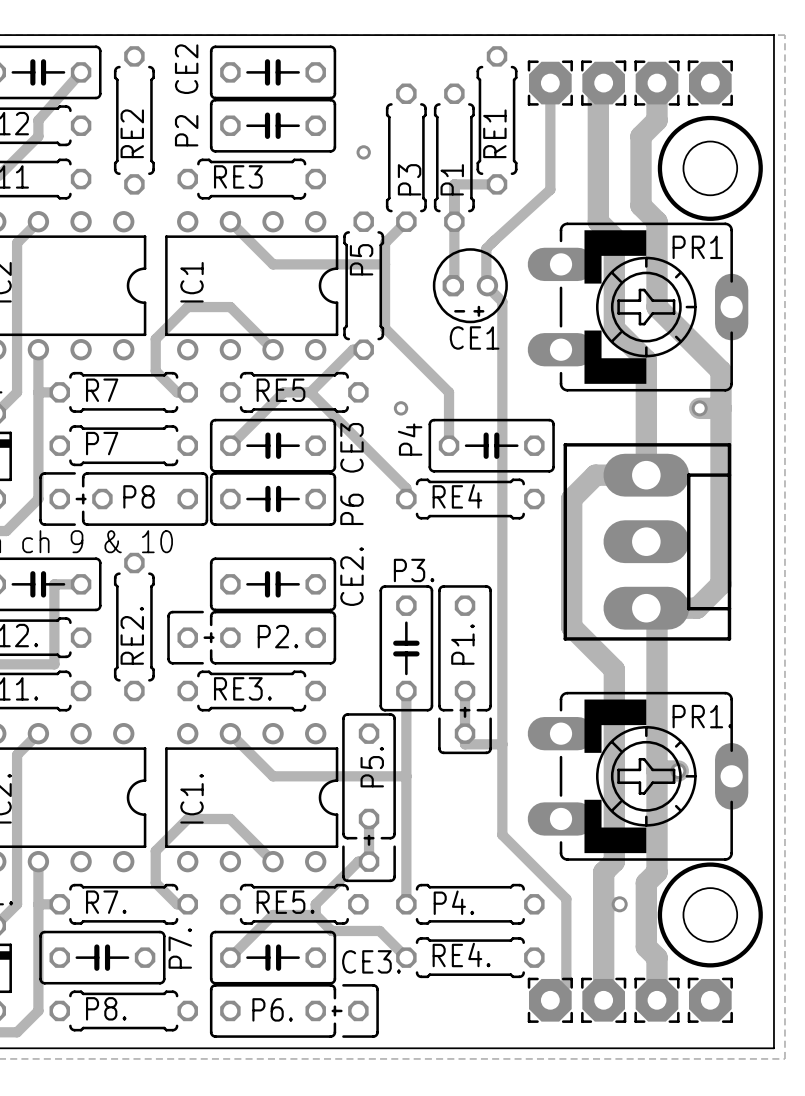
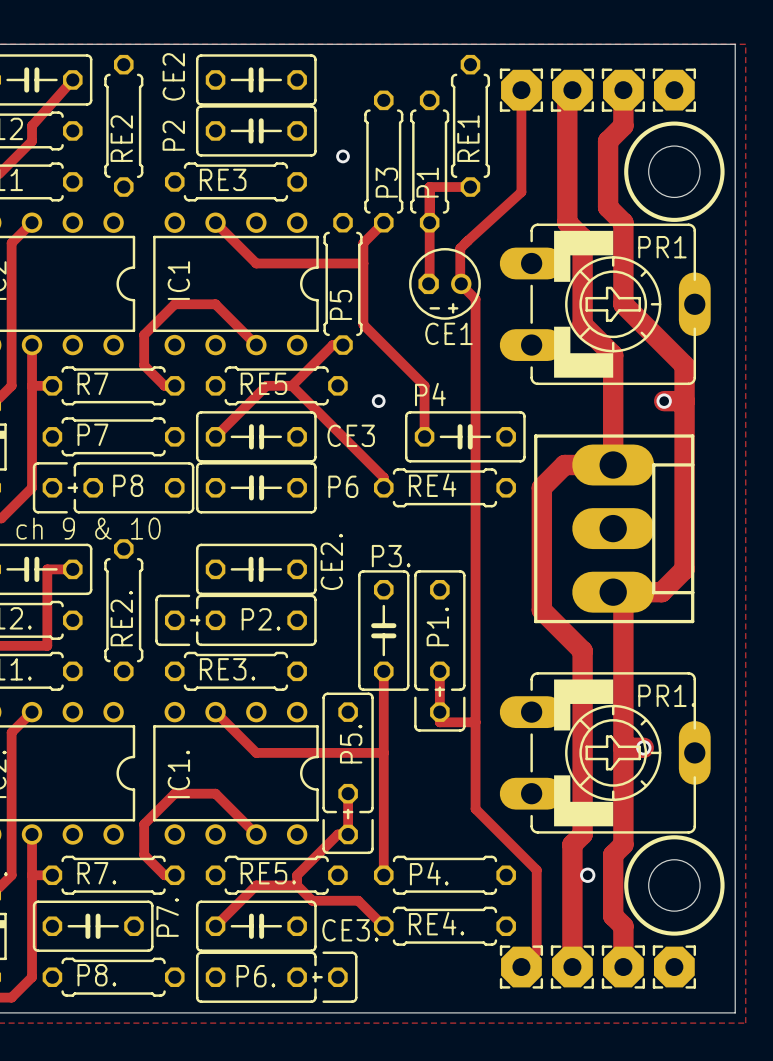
P5 name position: P5 (361, 259) -> P5 (340, 304)
P4 name rotation: 0° (410, 439) -> 90° clockwise (430, 394)
P4 name position: P4 (410, 439) -> P4 (430, 394)
CE3 name rotation: 0° (351, 447) -> 90° clockwise (351, 435)
P6 name rotation: 0° (351, 509) -> 90° clockwise (343, 486)

